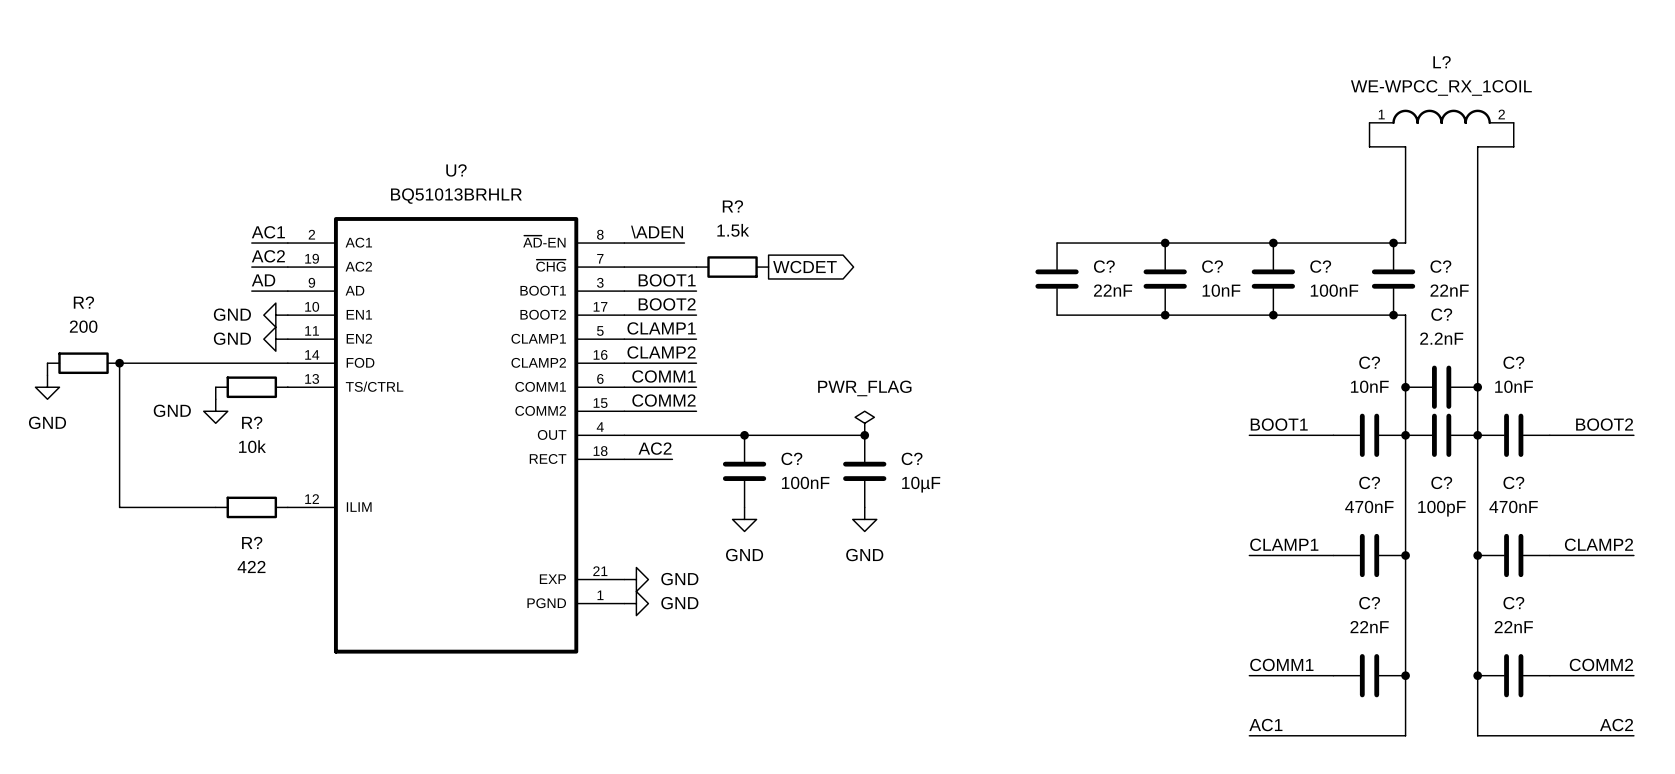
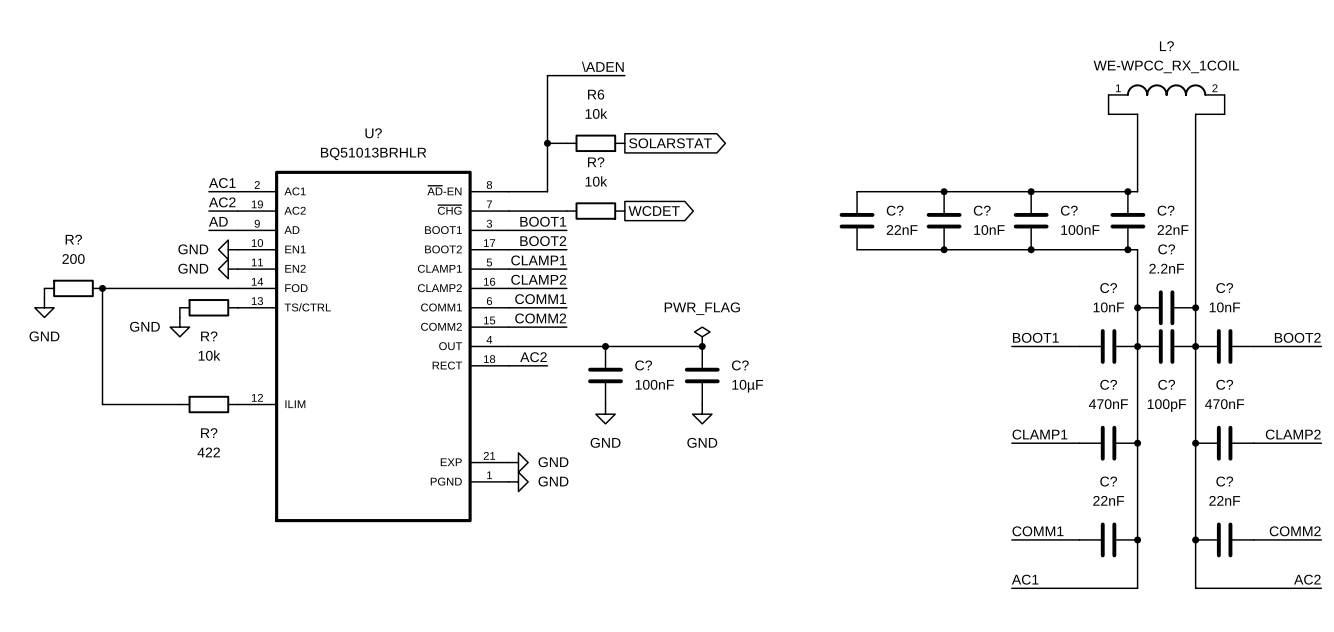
wire: none -> (547, 143) (566, 143)
junction: none -> (547, 143)
R6: none -> 10k (595, 143)
global label: none -> SOLARSTAT (670, 143)
R? value: 1.5k (733, 230) -> 10k (596, 181)
label position: \ADEN (657, 232) -> \ADEN (602, 66)
wire: (672, 243) (684, 243) -> (547, 191) (547, 75) (624, 75)

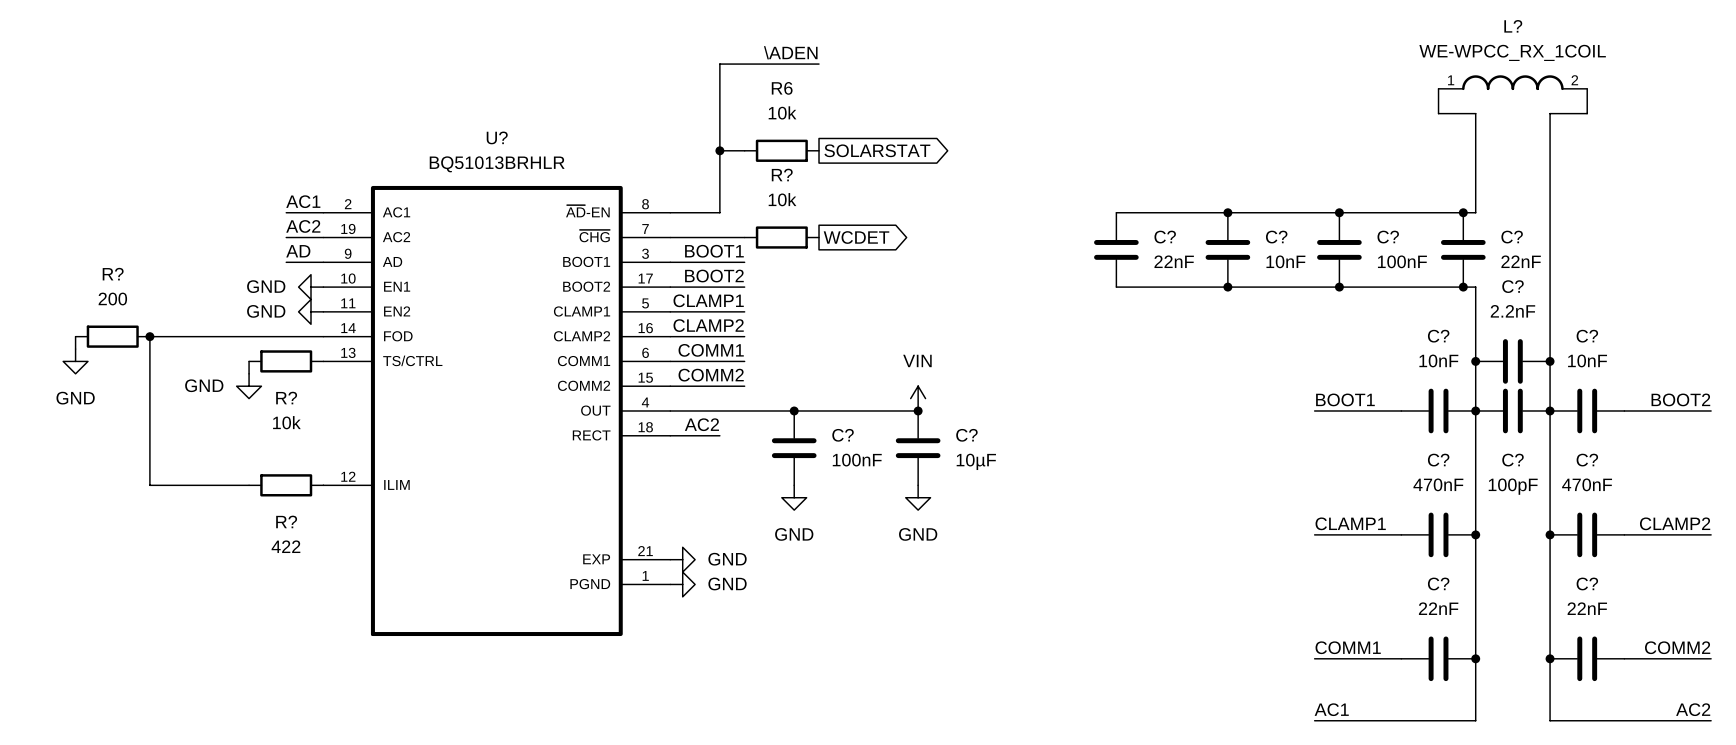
power symbol: PWR_FLAG (702, 336) -> VIN (918, 398)

